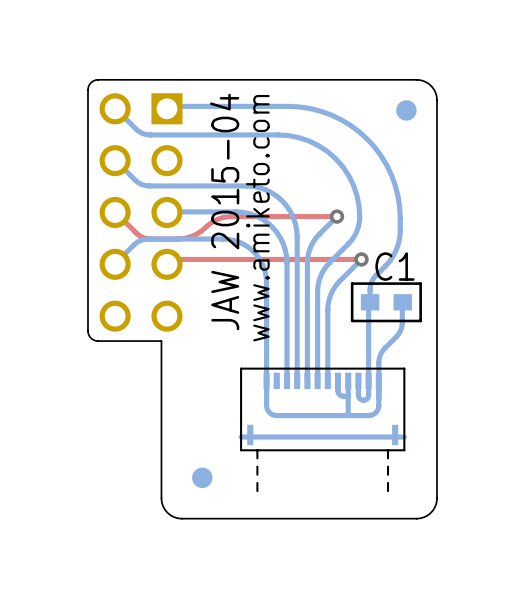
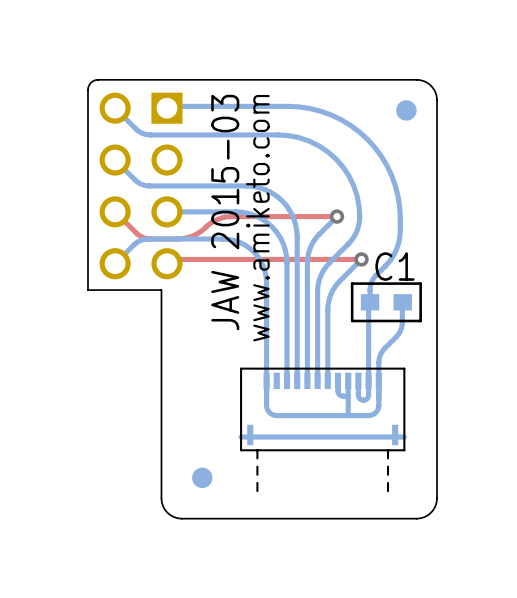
part: none -> (141, 185)
text: JAW 2015-04 (224, 211) -> JAW 2015-03 (225, 212)
part: (141, 212) -> none
board edge: (87, 290) (88, 332) (91, 338) (98, 341) (161, 341) -> (87, 290) (161, 290) (161, 341)

